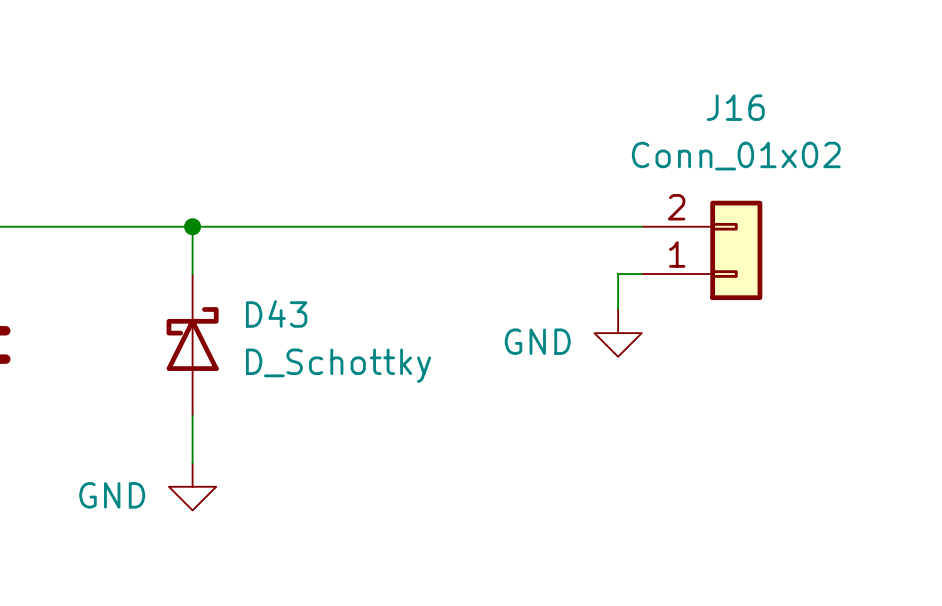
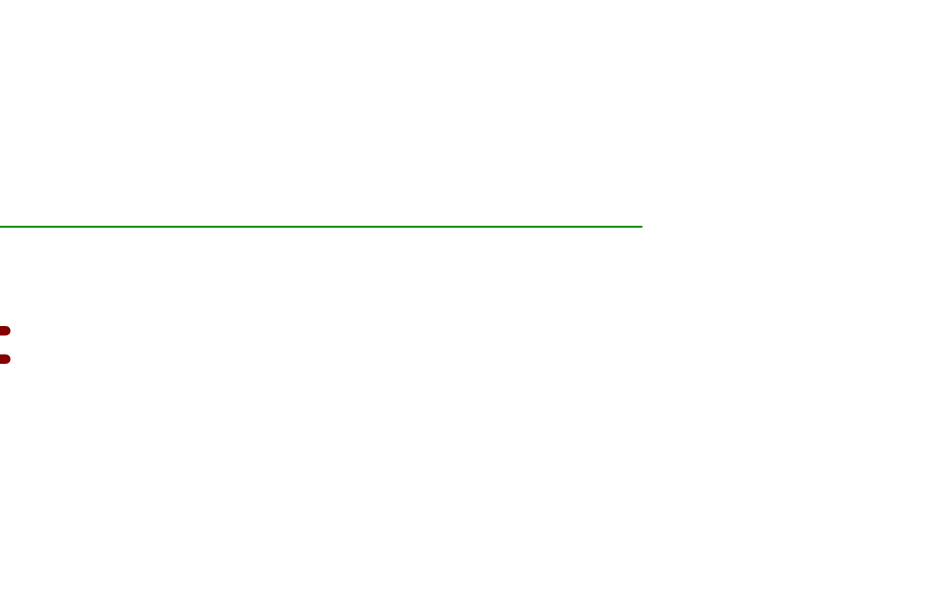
wire: (192, 226) (192, 274) -> none
junction: (192, 226) -> none
J16: Conn_01x02 (702, 250) -> none
wire: (641, 274) (618, 274) (618, 309) -> none
power symbol: GND (618, 333) -> none
D43: D_Schottky (192, 344) -> none
wire: (192, 415) (192, 463) -> none
power symbol: GND (192, 486) -> none

